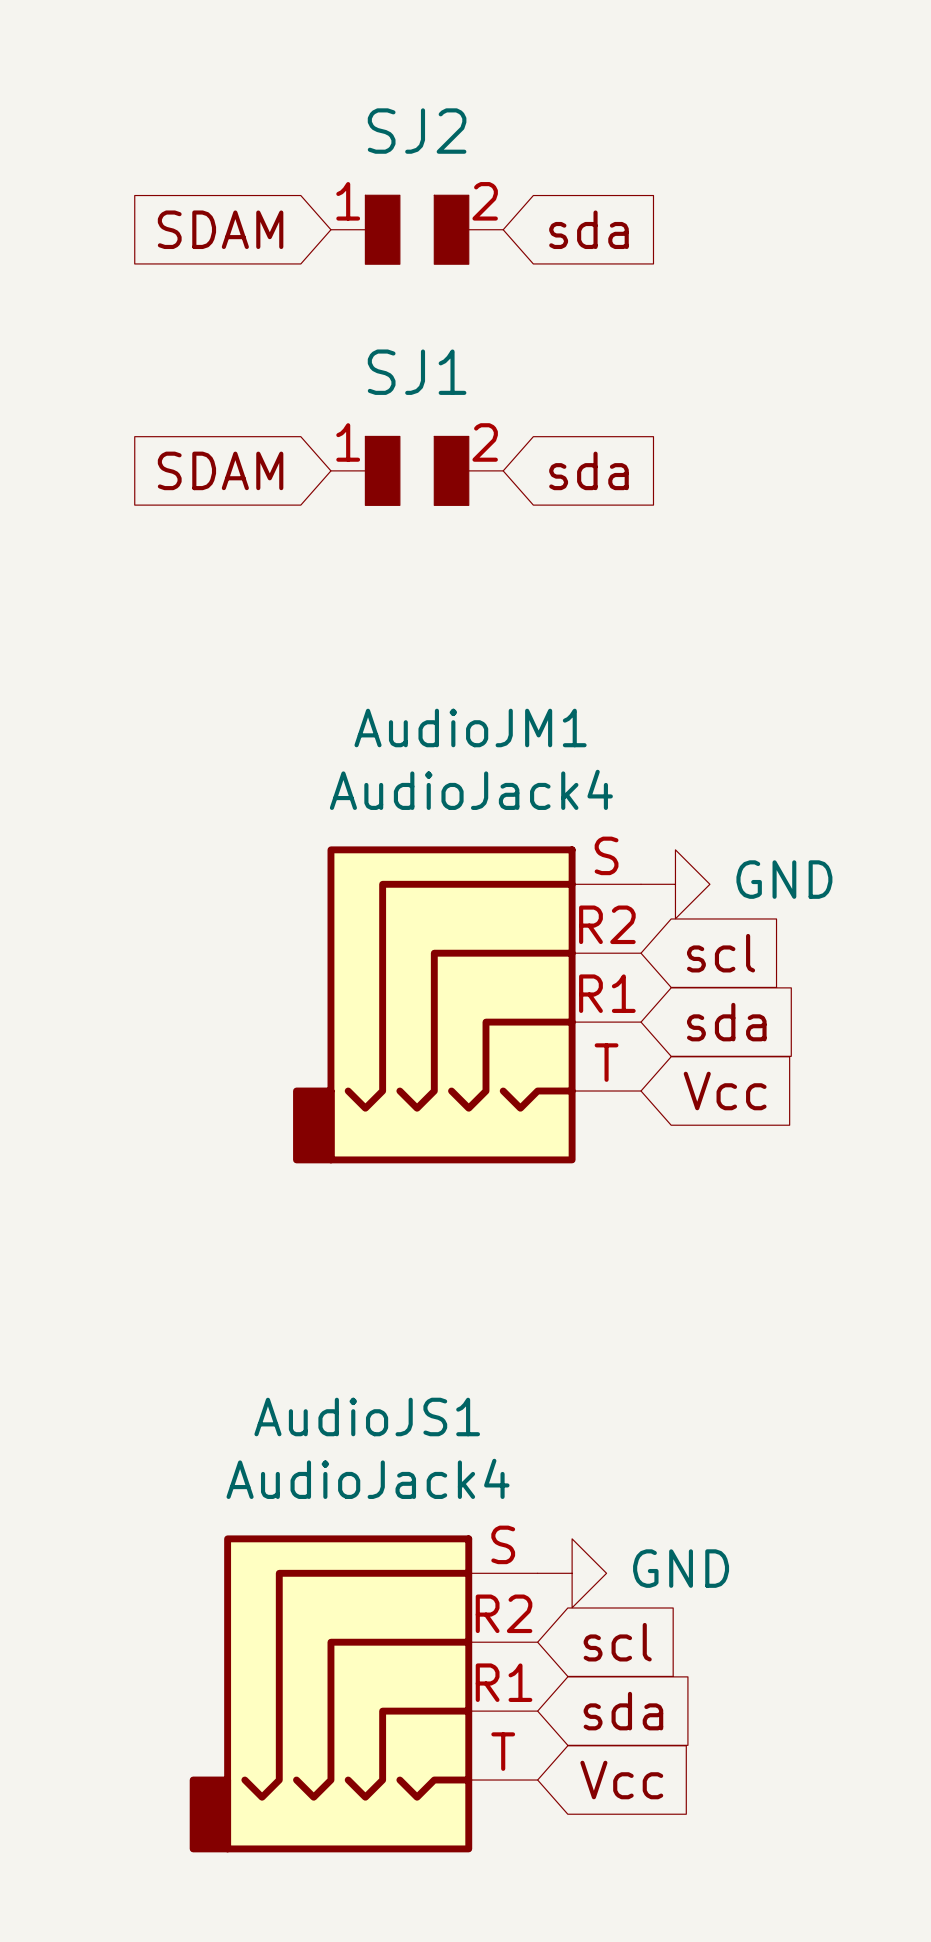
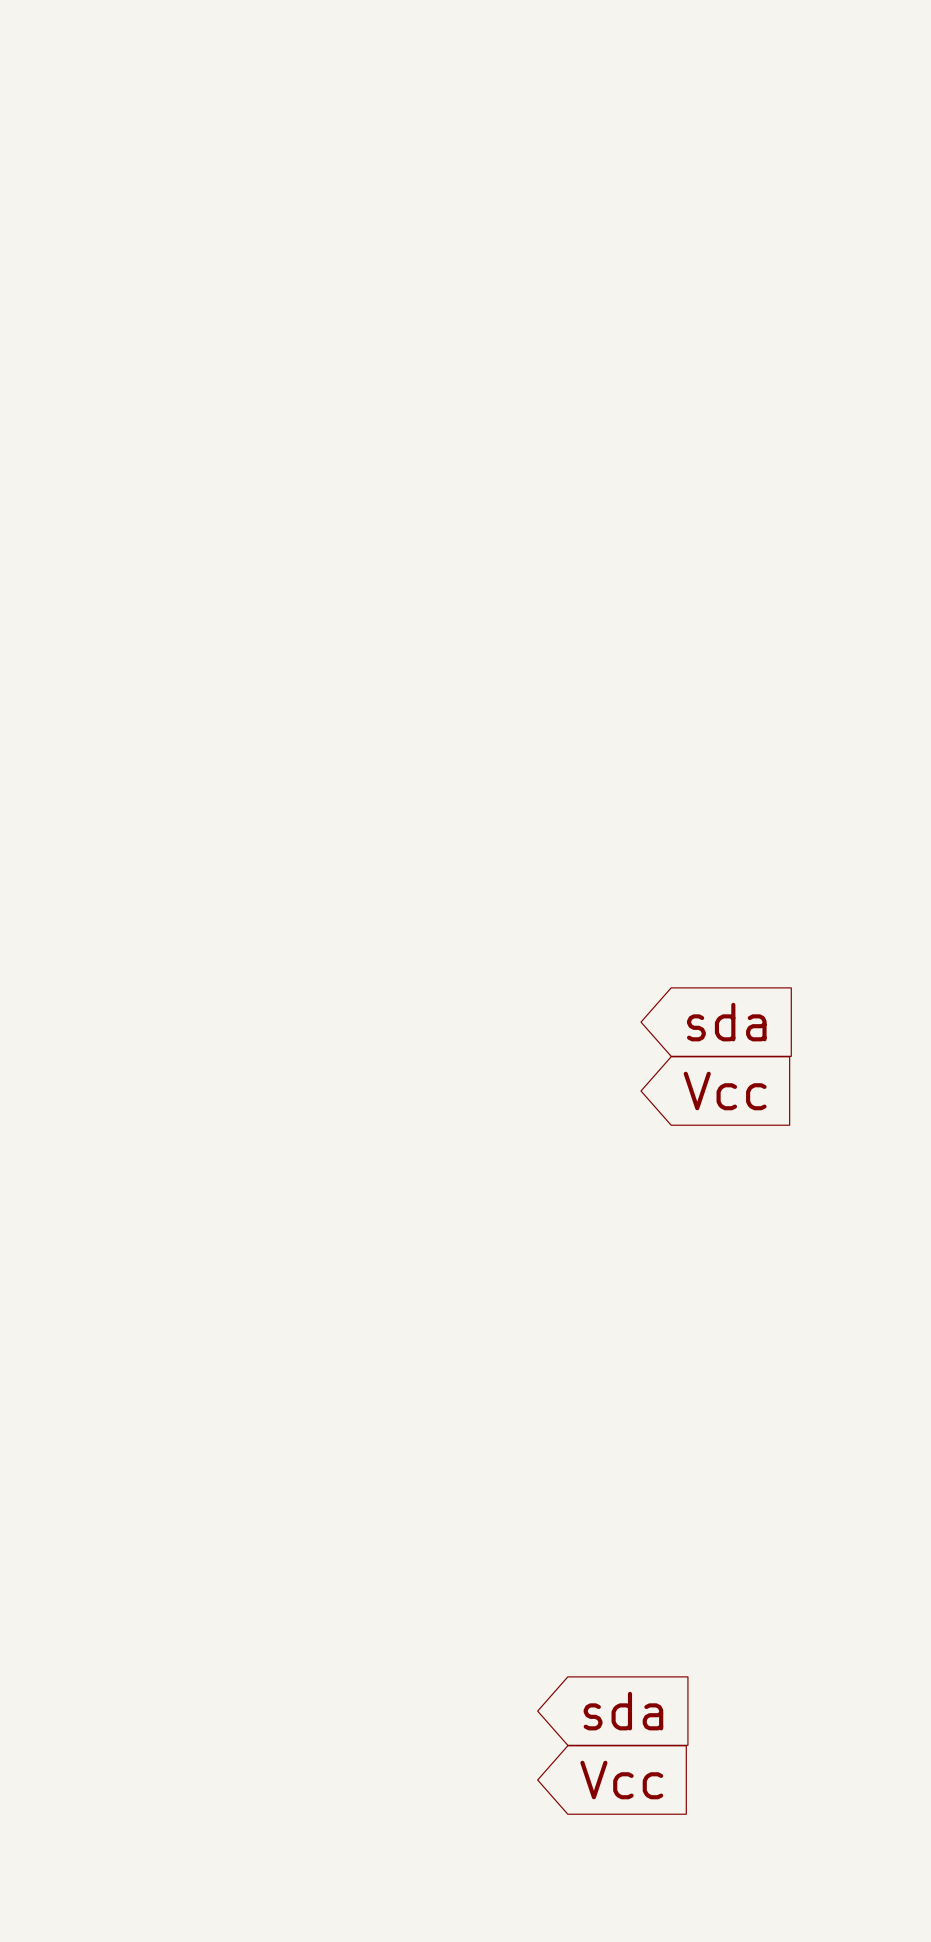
global label: SDAM (220, 229) -> none
SJ2: (417, 229) -> none
global label: sda (588, 229) -> none
global label: SDAM (220, 470) -> none
SJ1: (417, 470) -> none
global label: sda (588, 470) -> none
power symbol: GND (675, 884) -> none
global label: scl (721, 953) -> none
AudioJM1: AudioJack4 (467, 1004) -> none
power symbol: GND (572, 1573) -> none
global label: scl (617, 1642) -> none
AudioJS1: AudioJack4 (363, 1693) -> none

